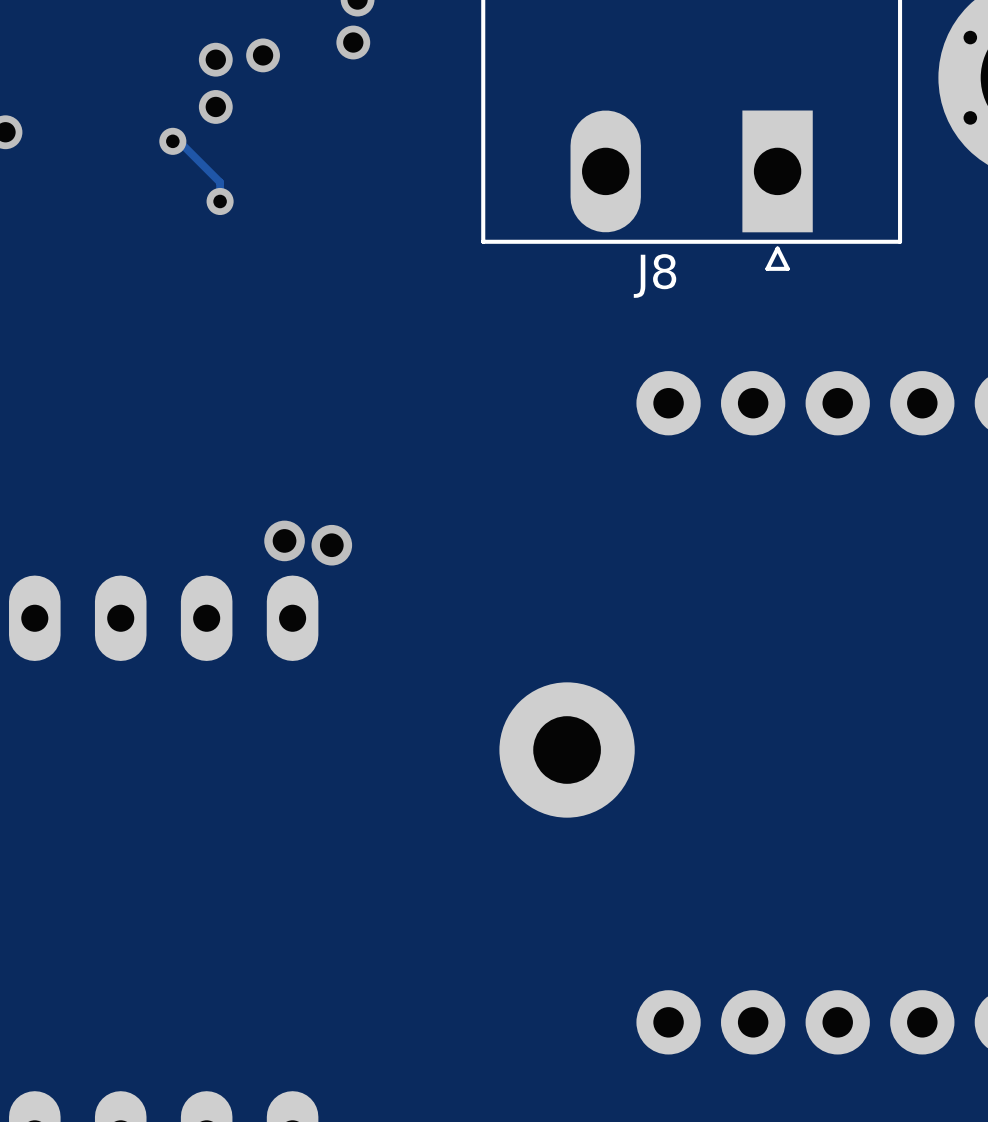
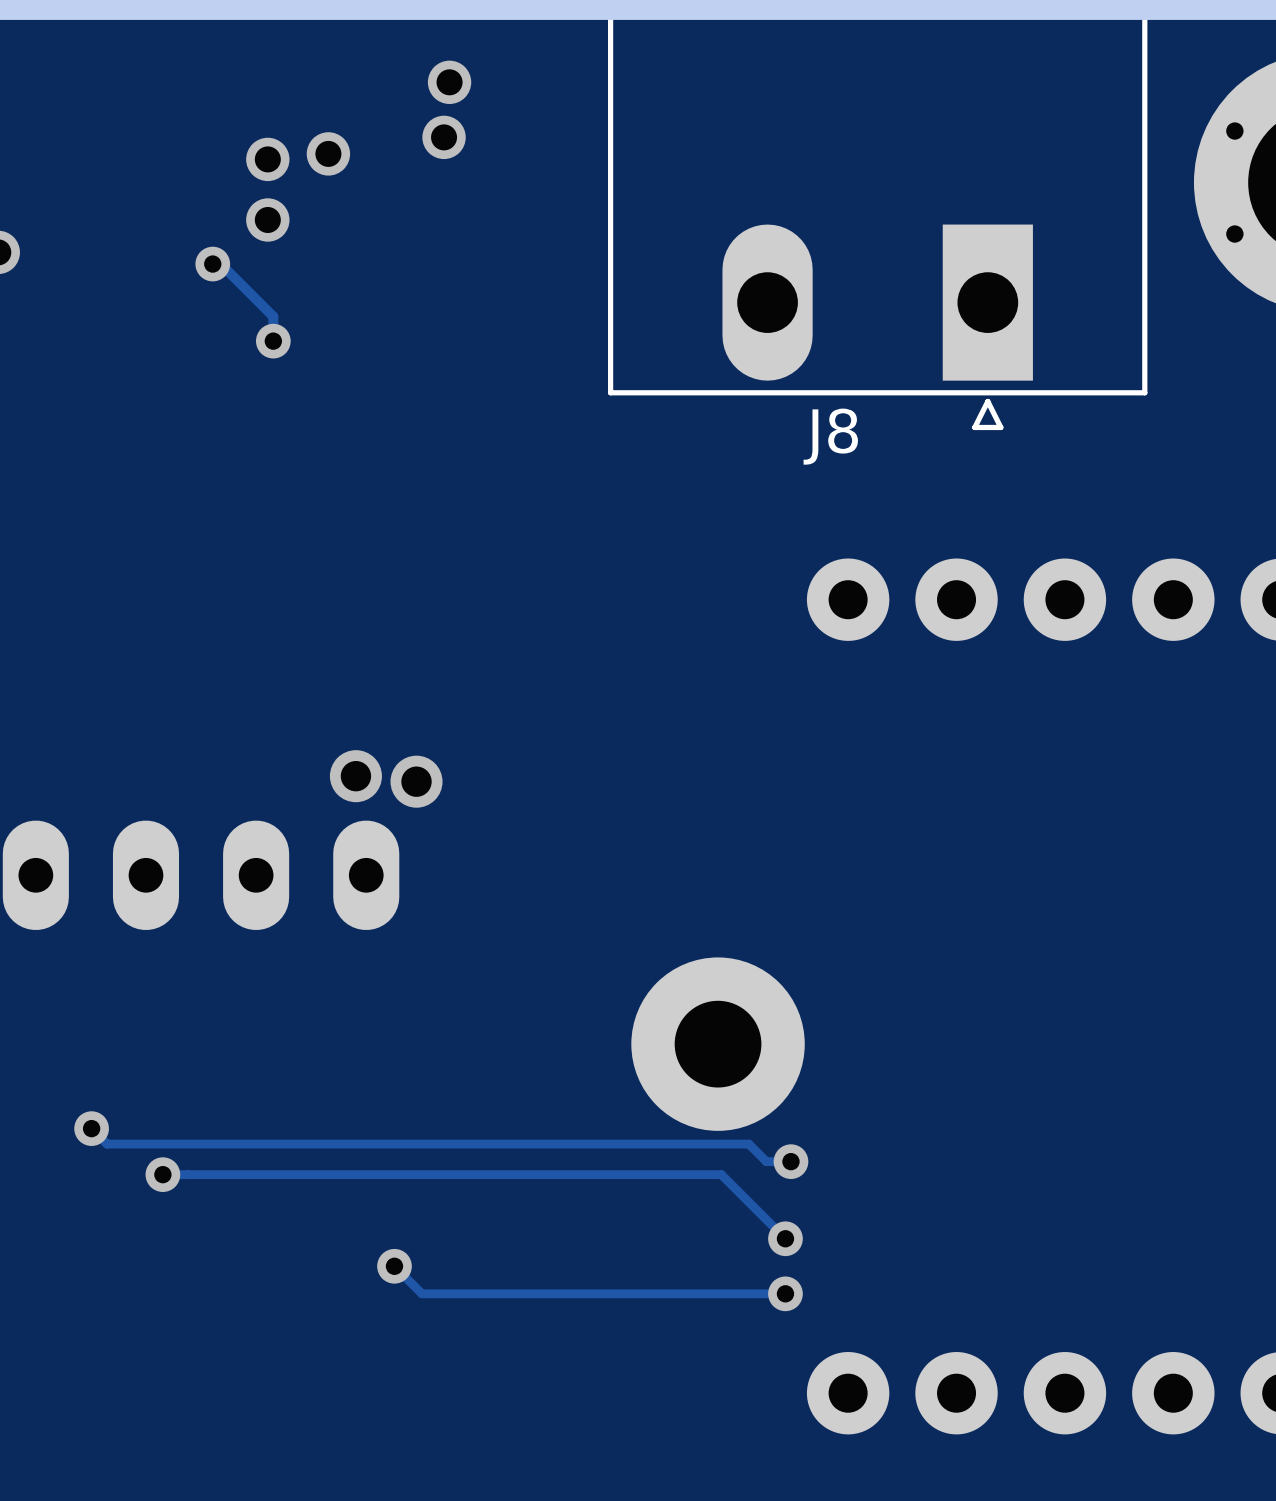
track: none -> (91, 1128) (107, 1144) (748, 1144) (766, 1161) (790, 1161)
via: none -> (91, 1128)
via: none -> (790, 1161)
track: none -> (162, 1174) (721, 1174) (785, 1238)
via: none -> (162, 1174)
via: none -> (785, 1238)
track: none -> (394, 1266) (422, 1293) (785, 1293)
via: none -> (394, 1266)
via: none -> (785, 1293)

